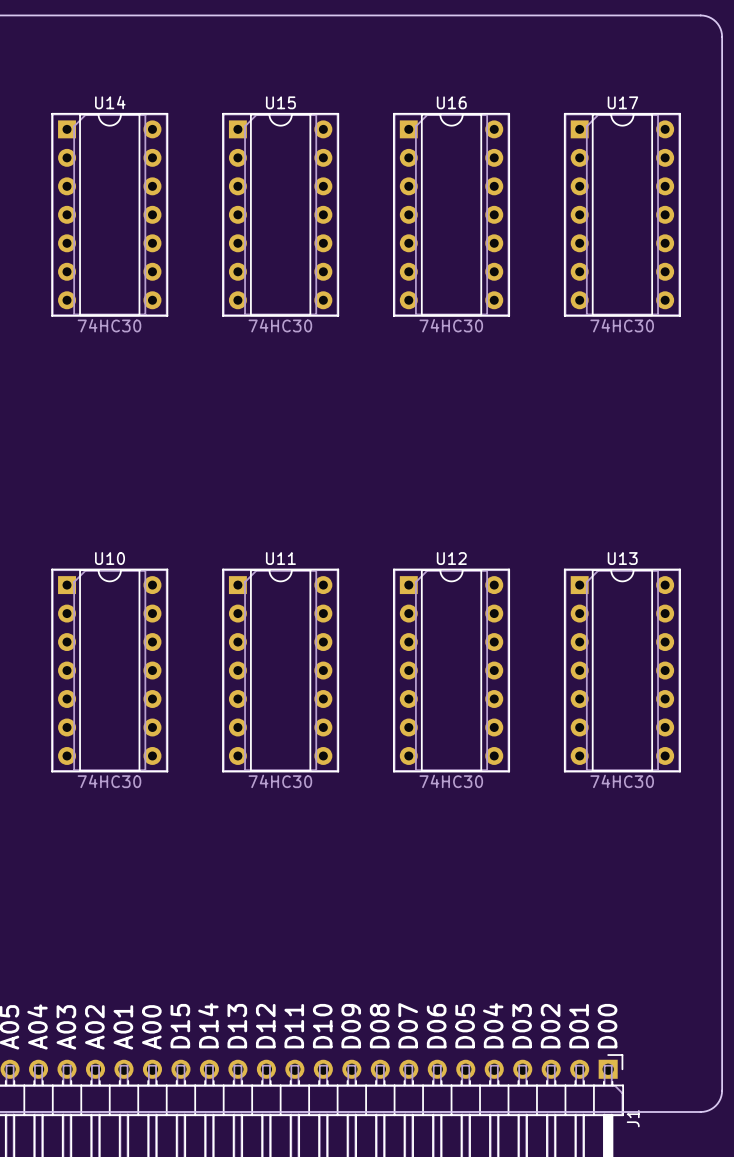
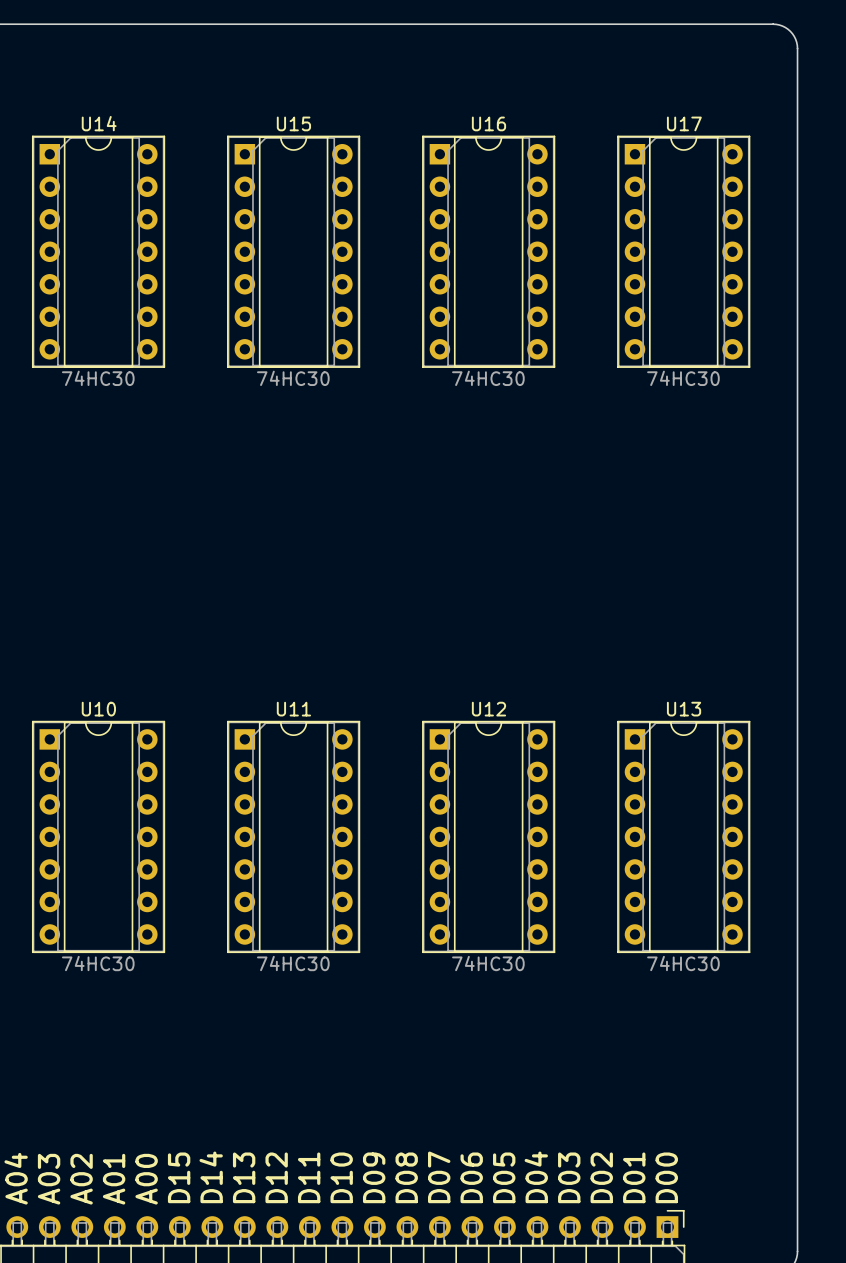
U10 position: (109, 670) -> (98, 836)
U11 position: (280, 670) -> (293, 836)
U12 position: (451, 670) -> (488, 836)
U13 position: (622, 670) -> (683, 836)

